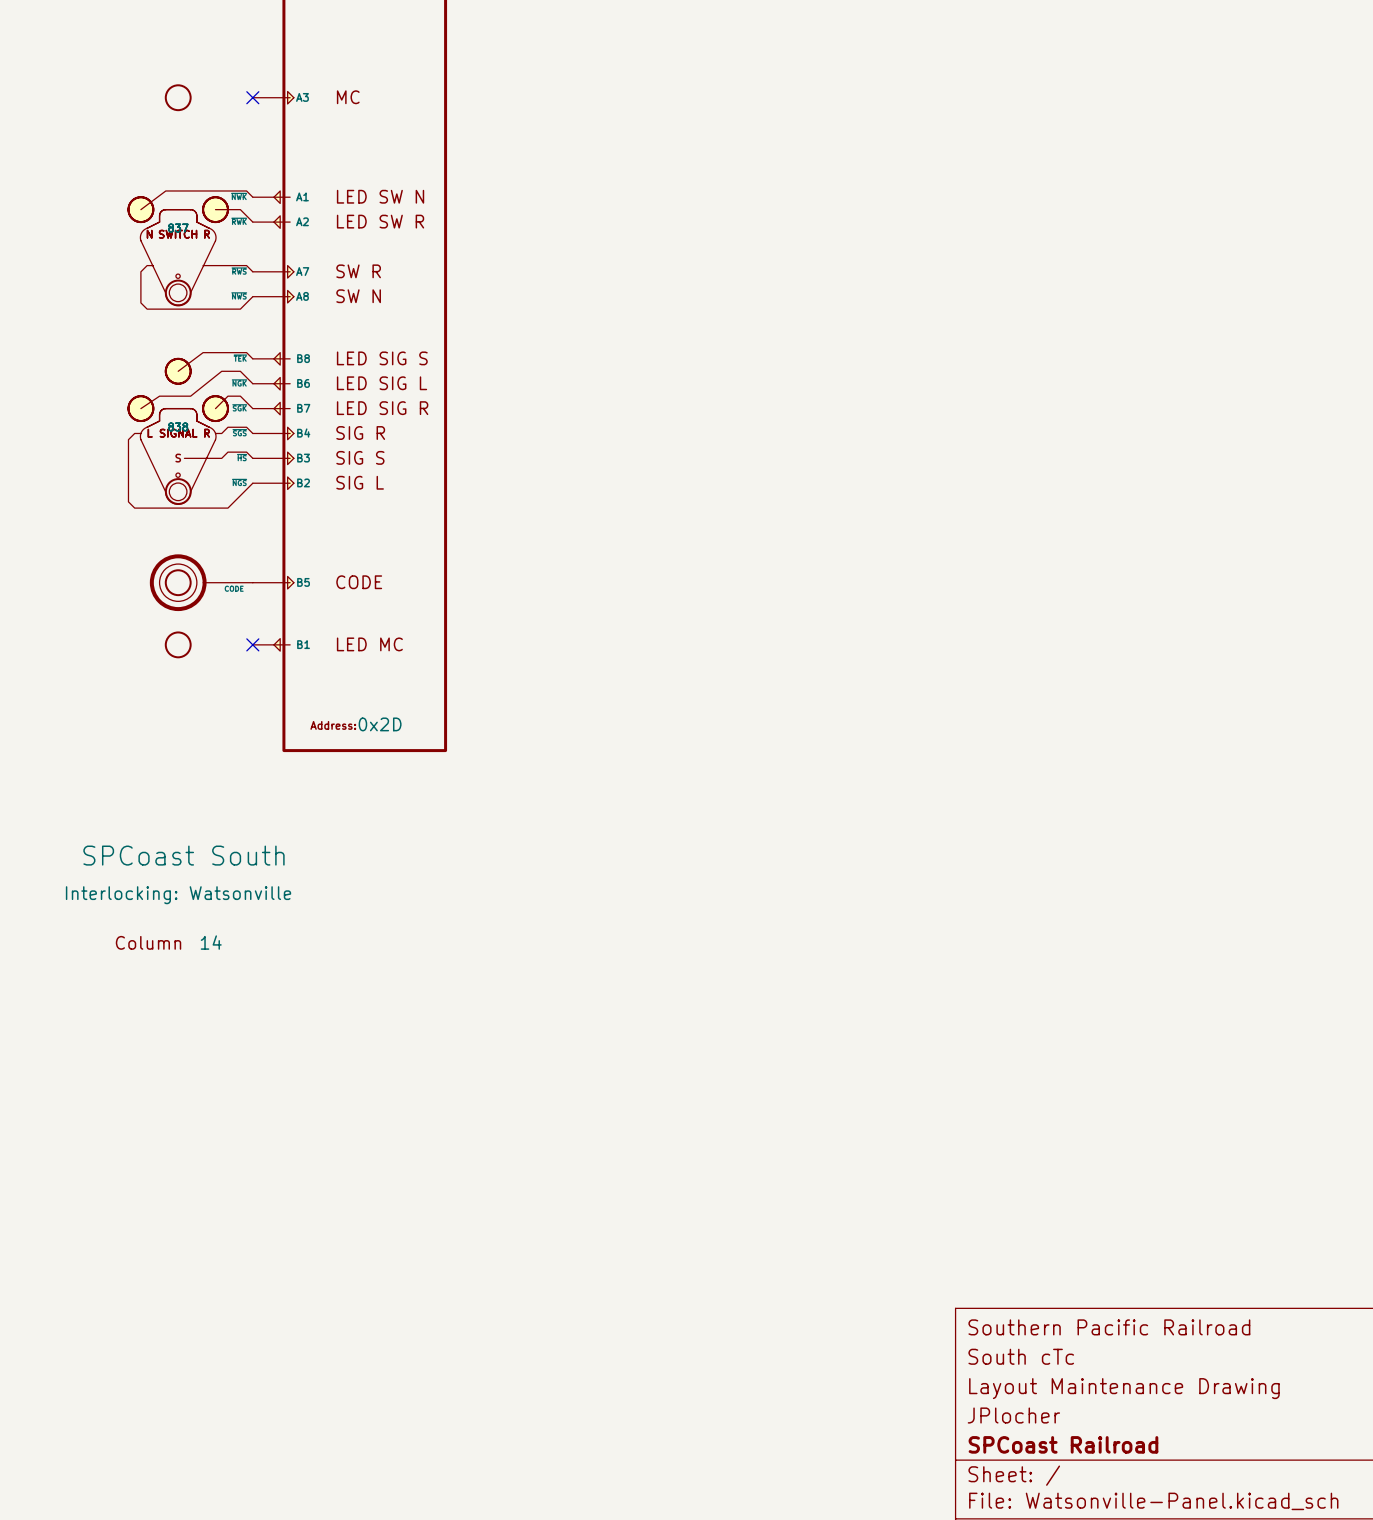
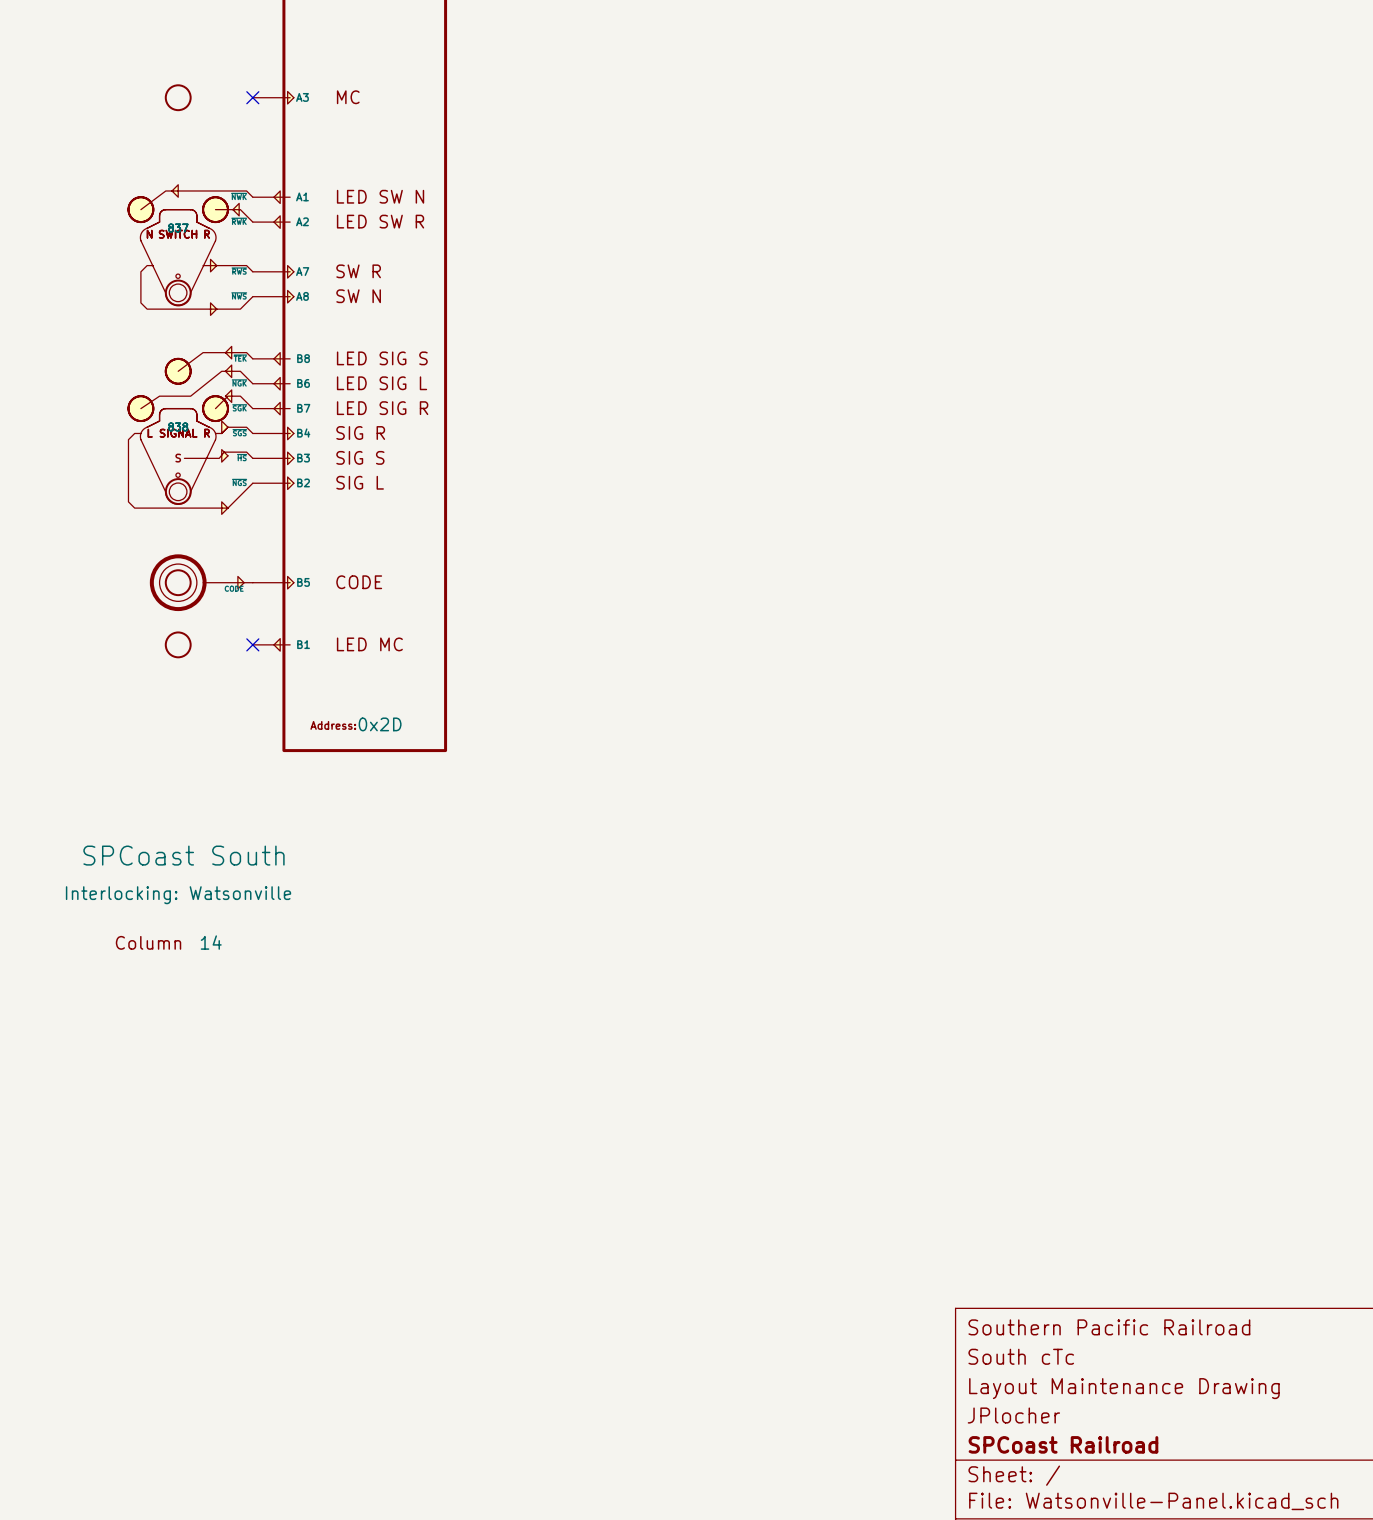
part symbol: [127, 190, 253, 229] -> [127, 184, 253, 229]
part symbol: [140, 209, 253, 310] -> [140, 209, 253, 316]
part symbol: [127, 352, 253, 428] -> [127, 346, 253, 428]
part symbol: [128, 408, 253, 509] -> [128, 408, 253, 515]
part symbol: [149, 554, 253, 612] -> [149, 554, 253, 612]

